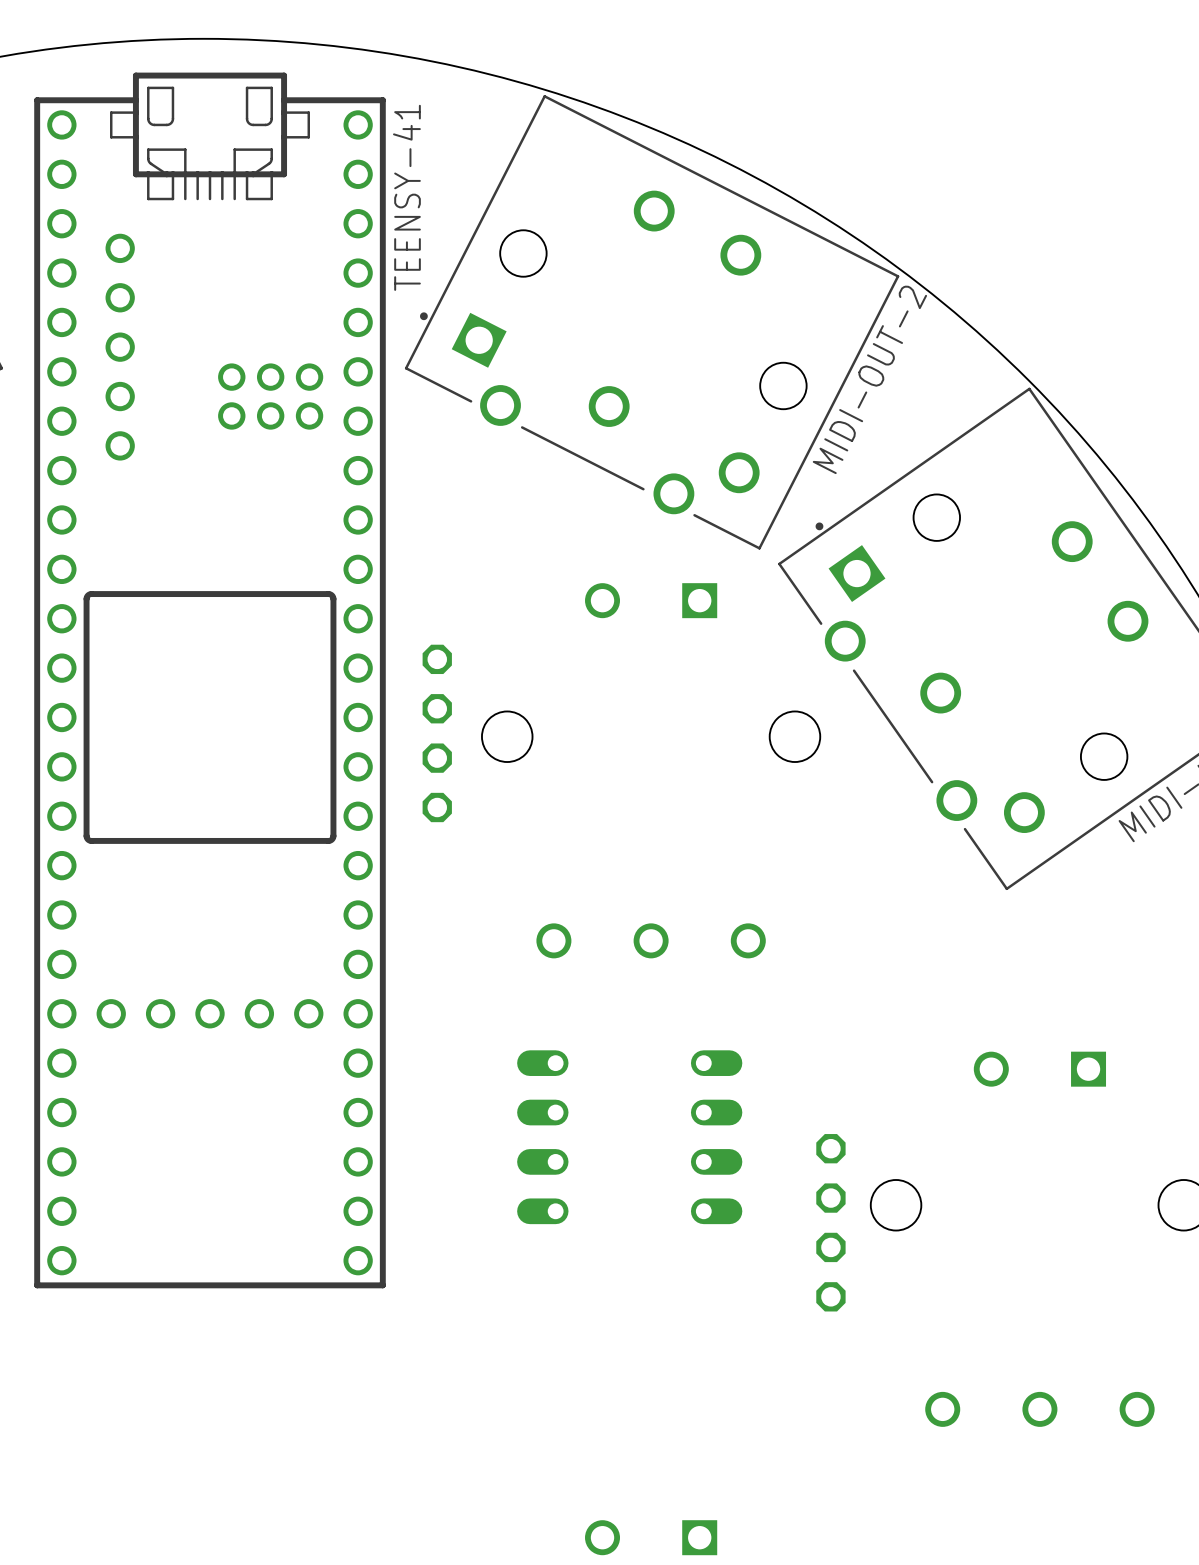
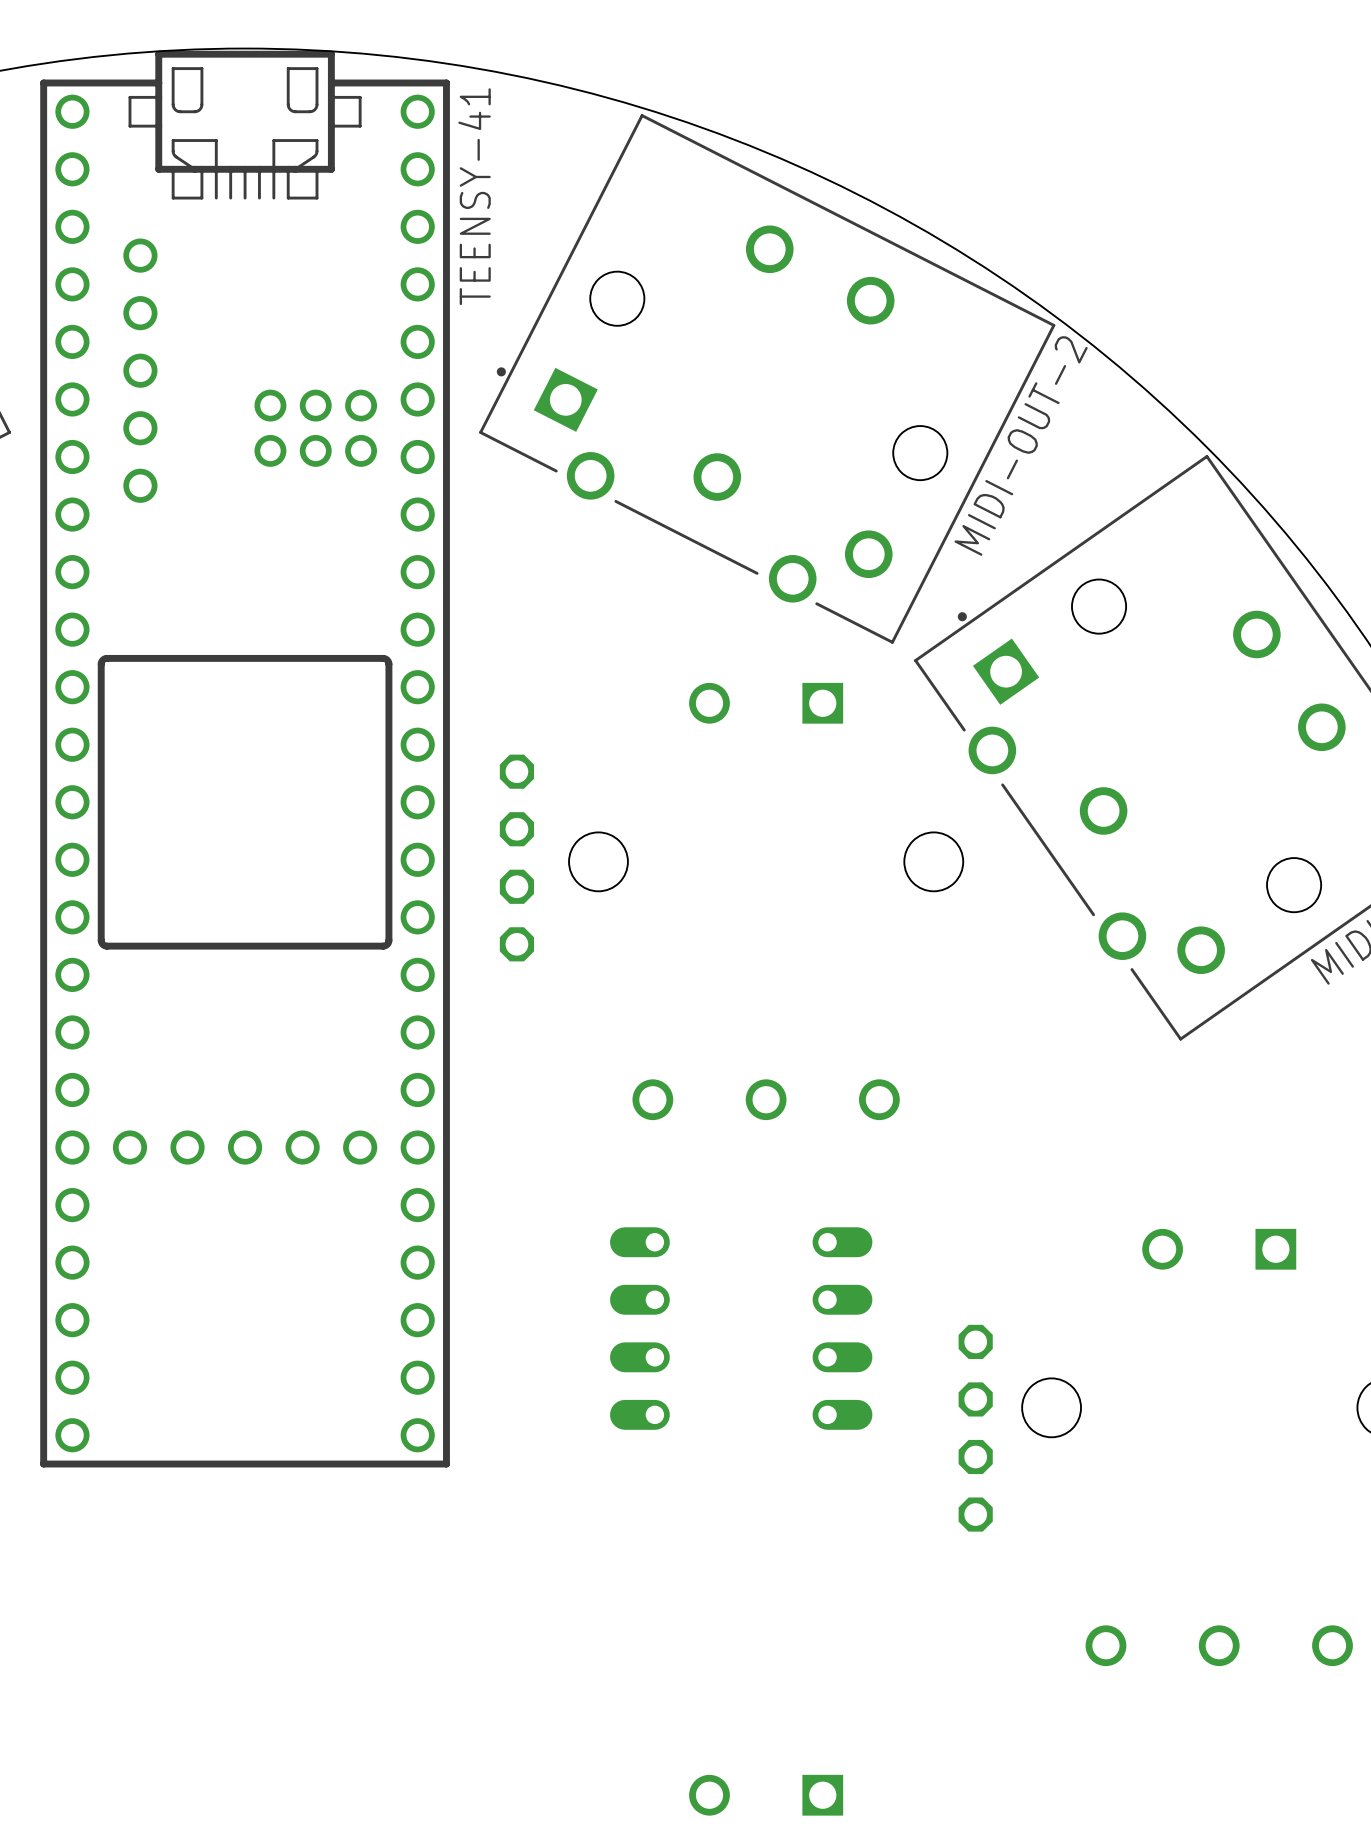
TEENSY-41 position: (210, 680) -> (245, 759)

